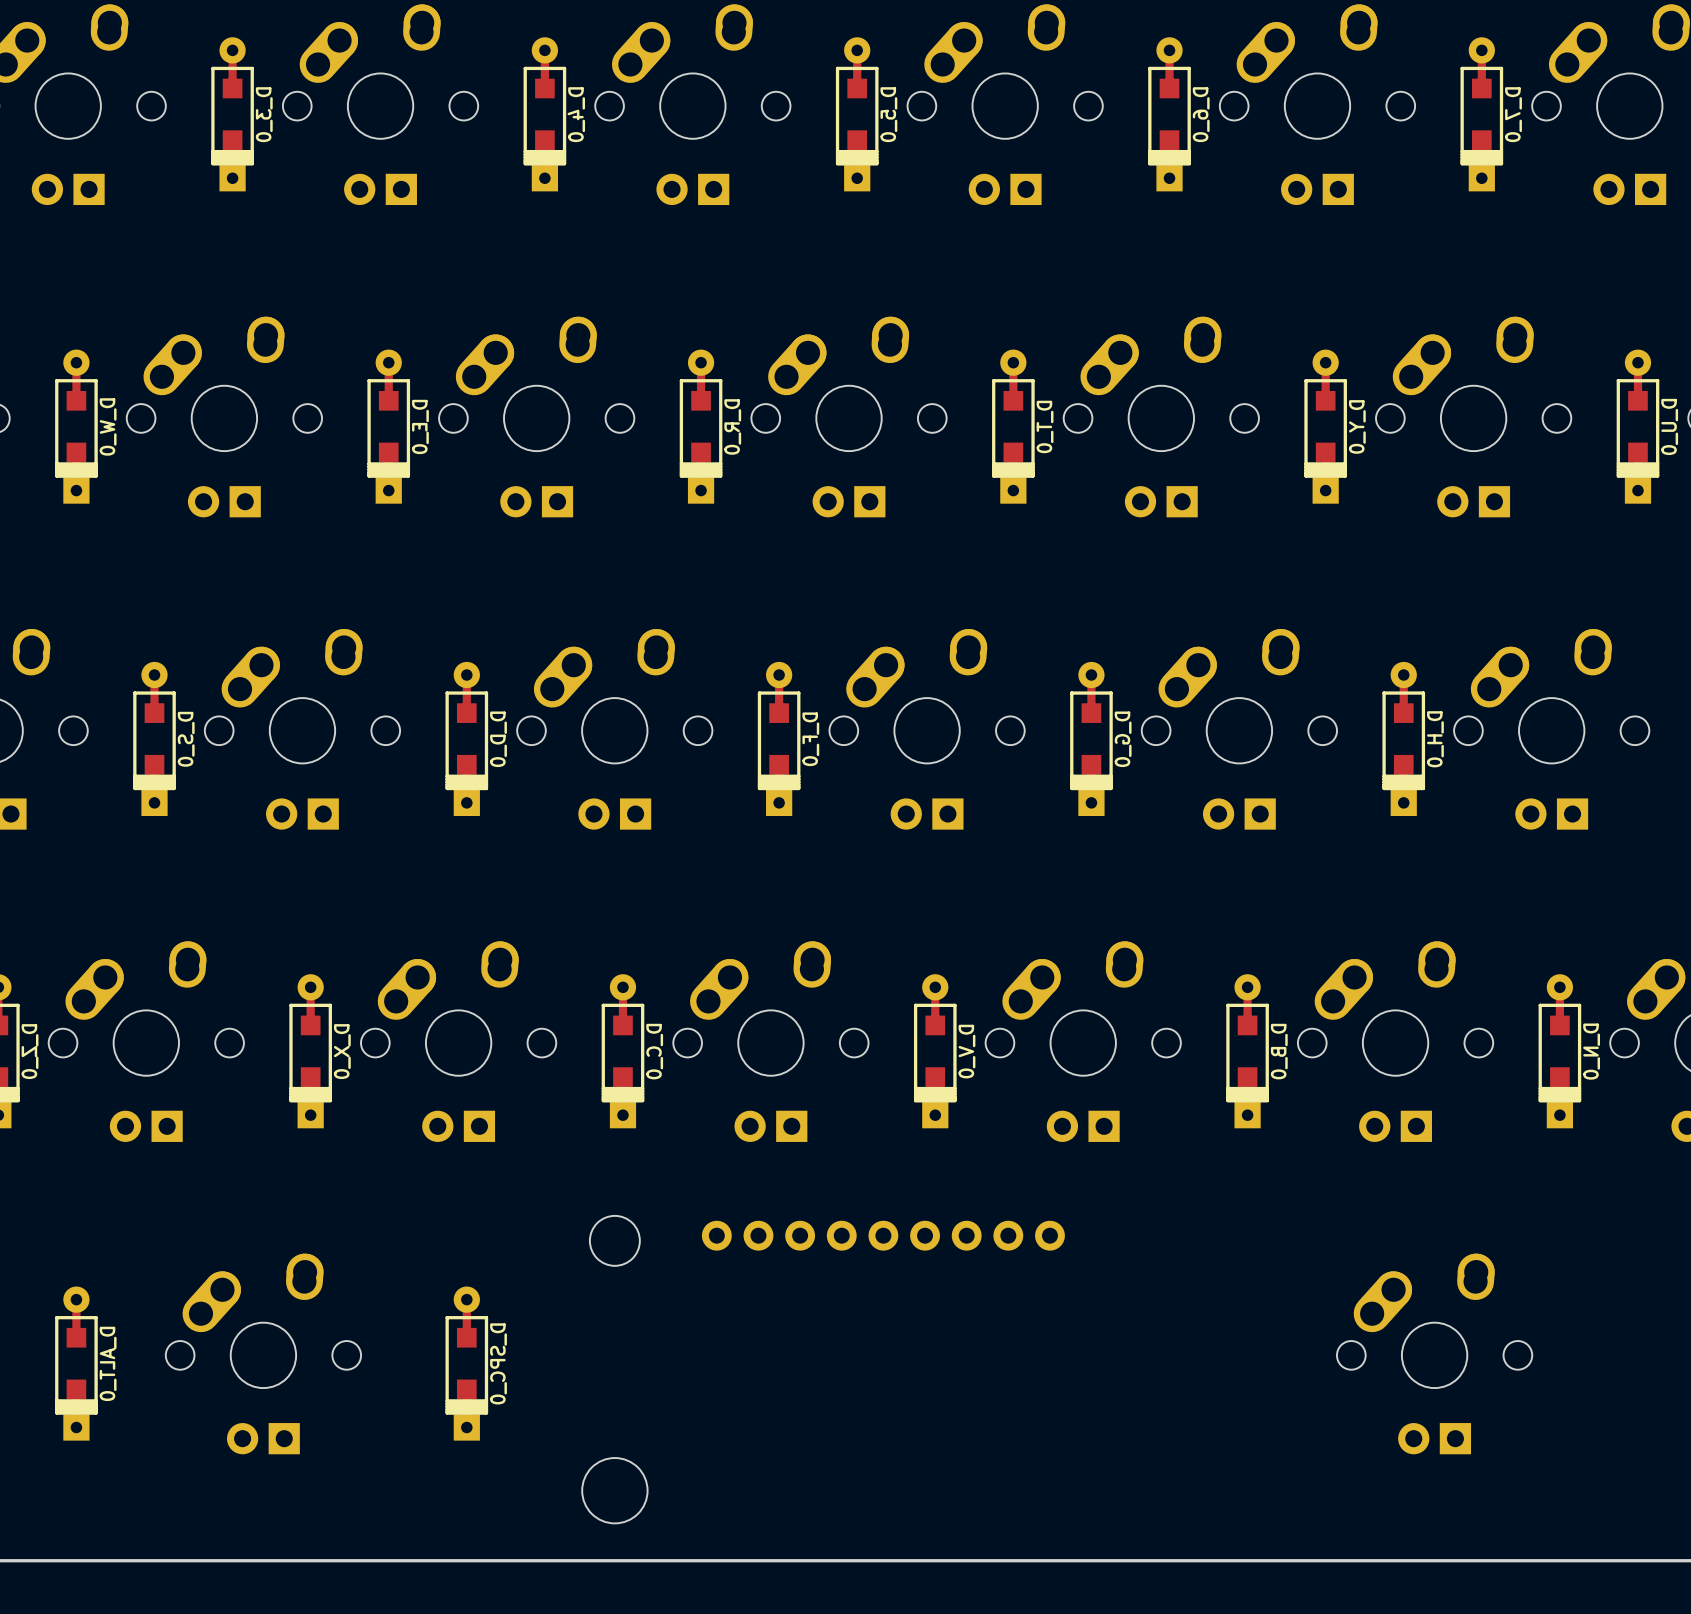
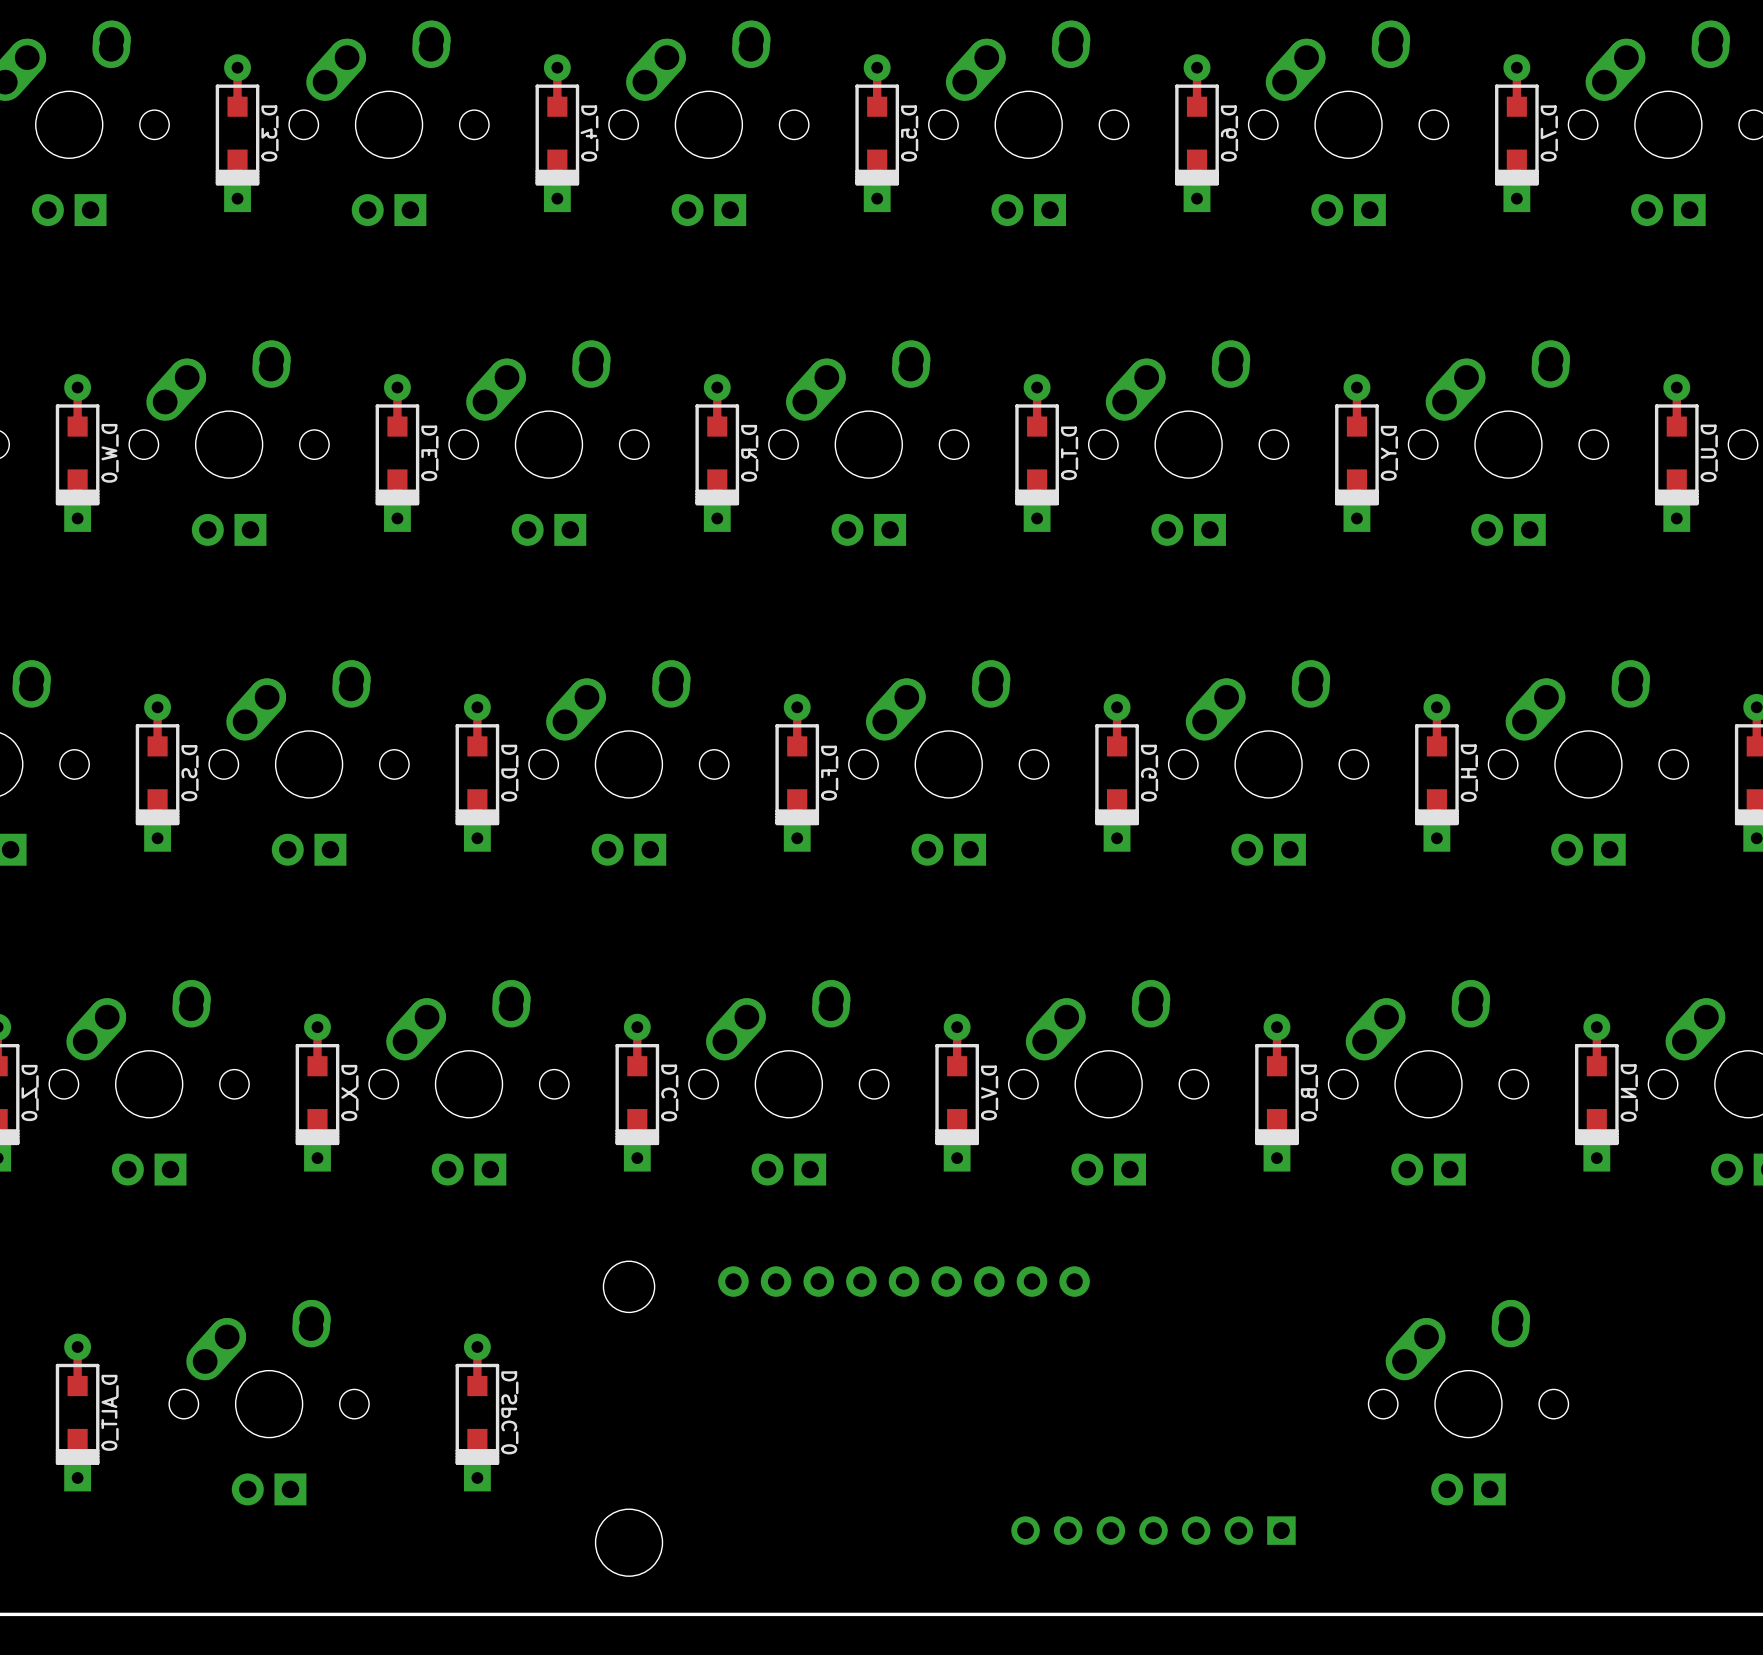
part: none -> (1153, 1530)

